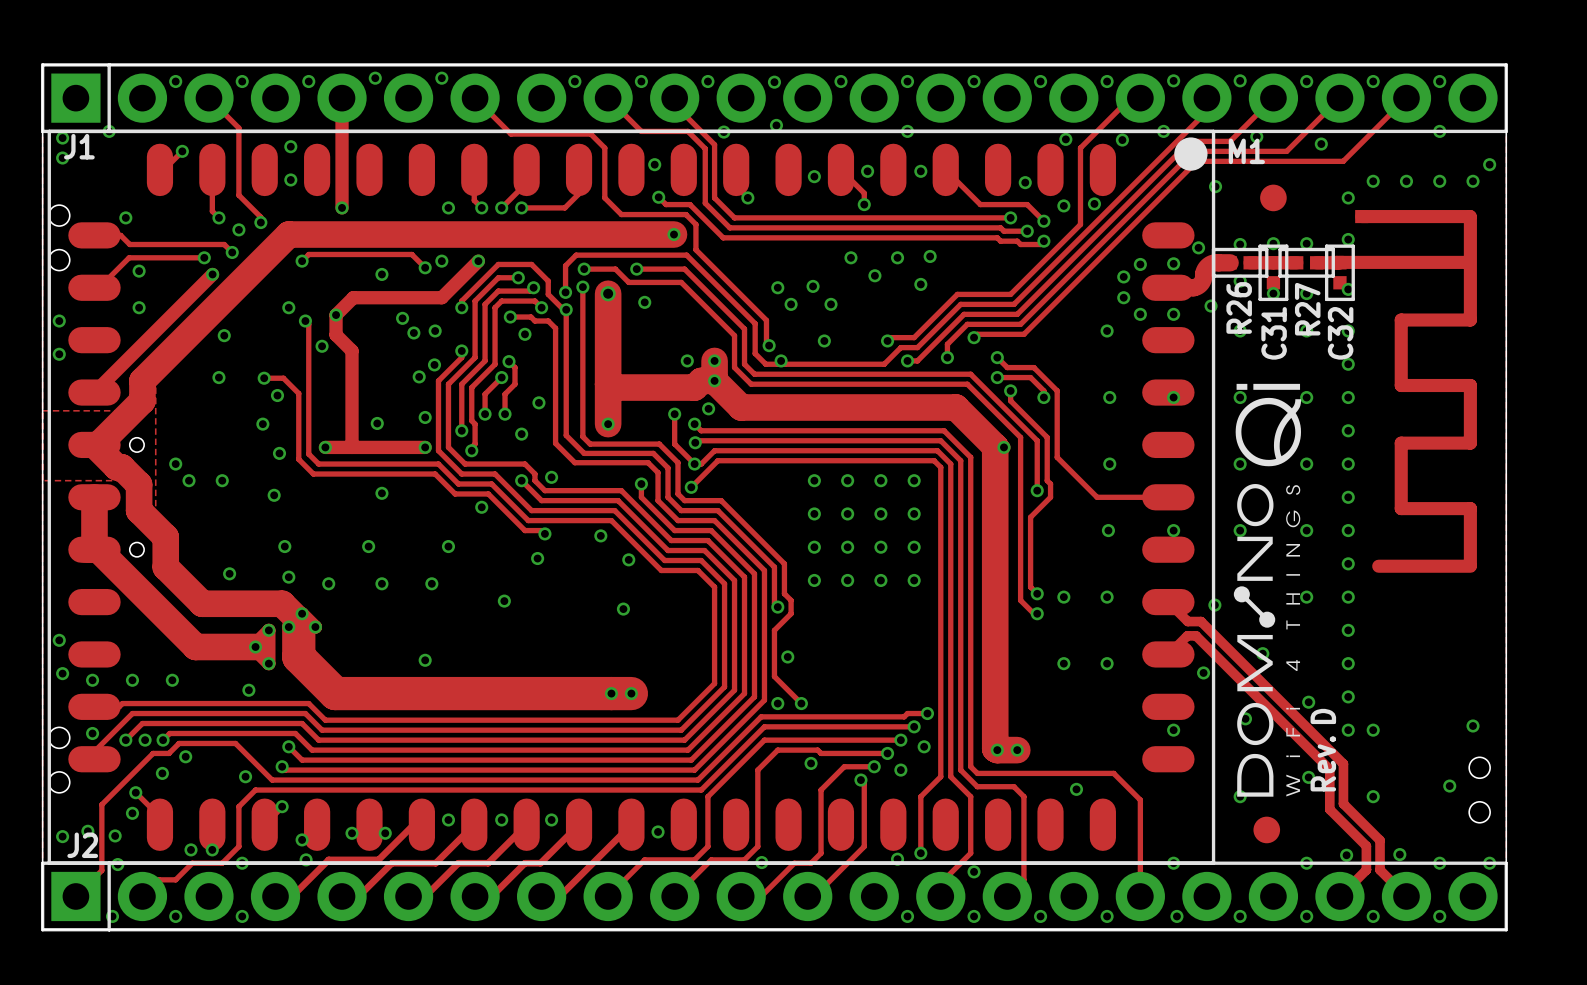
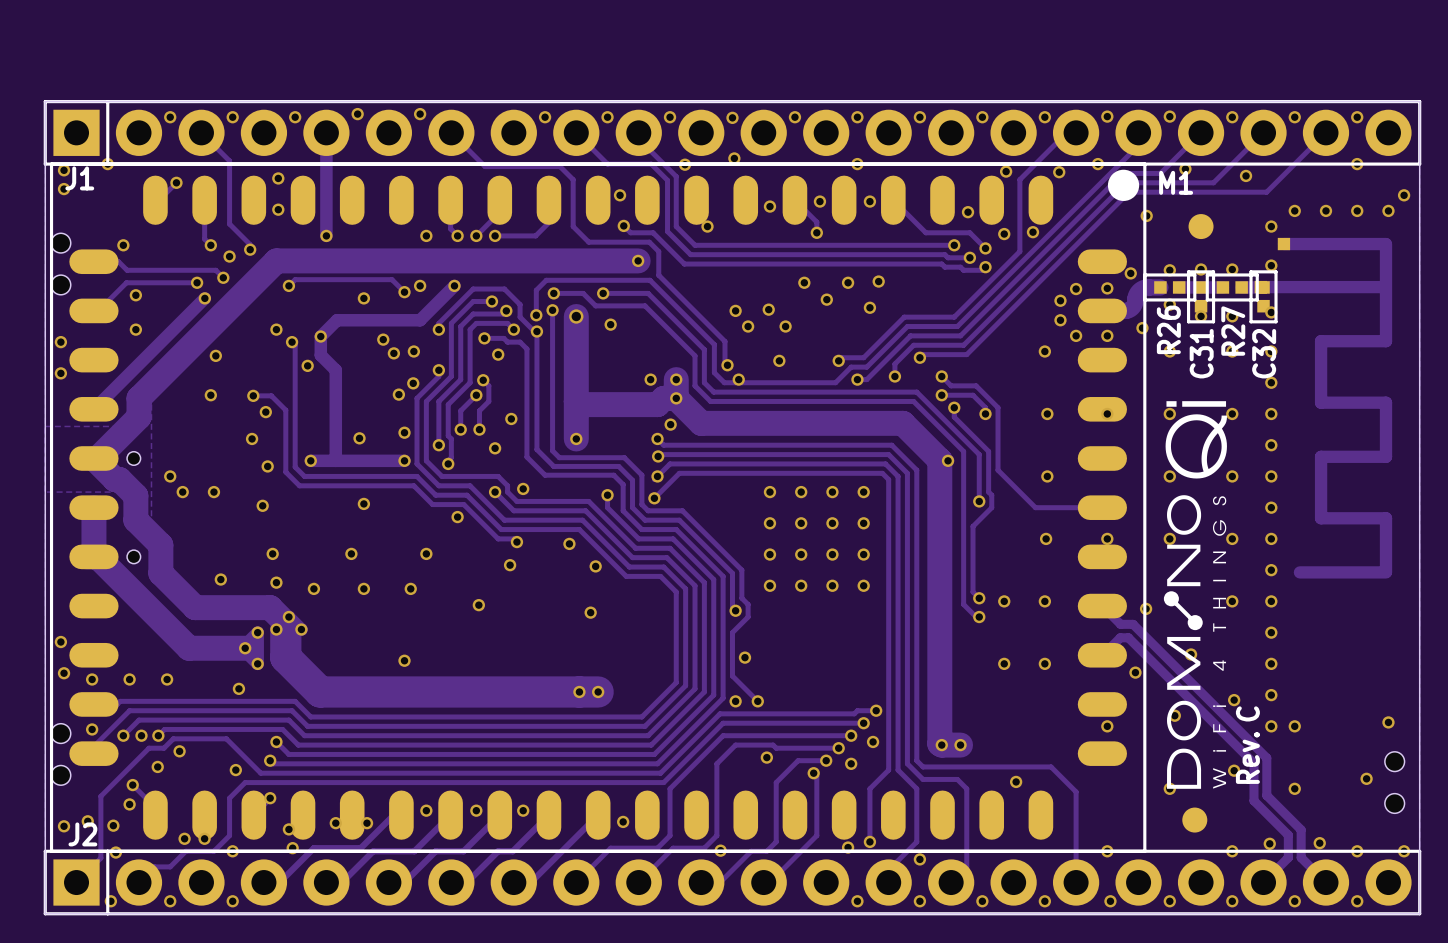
track: (674, 414) (674, 444) (694, 464) (701, 464) (714, 450) -> (654, 479) (670, 463) (676, 463)
via: (674, 414) -> none
text: D (1323, 716) -> C (1247, 713)

